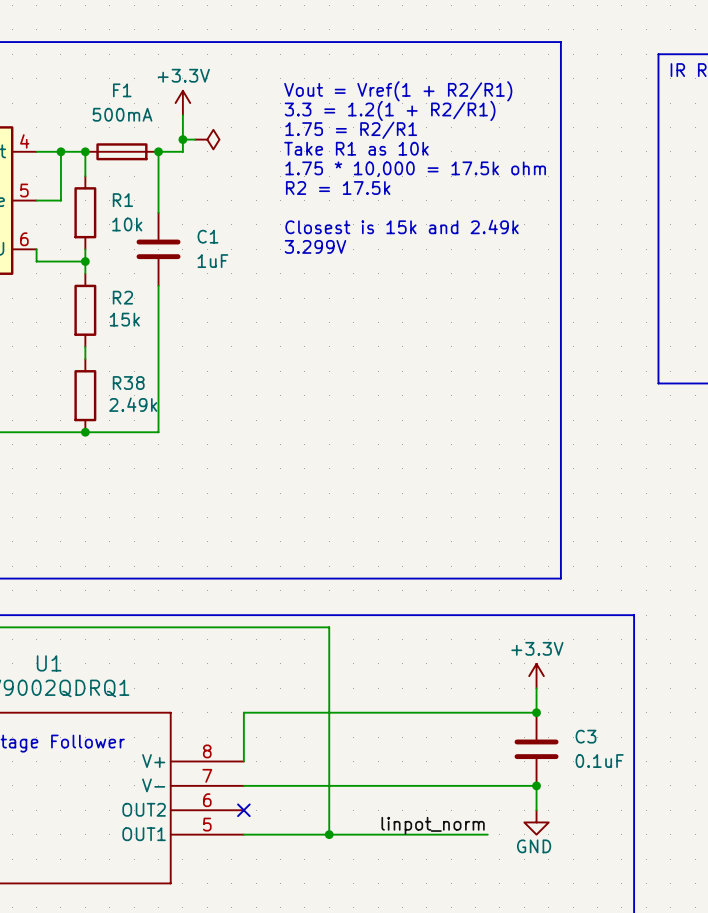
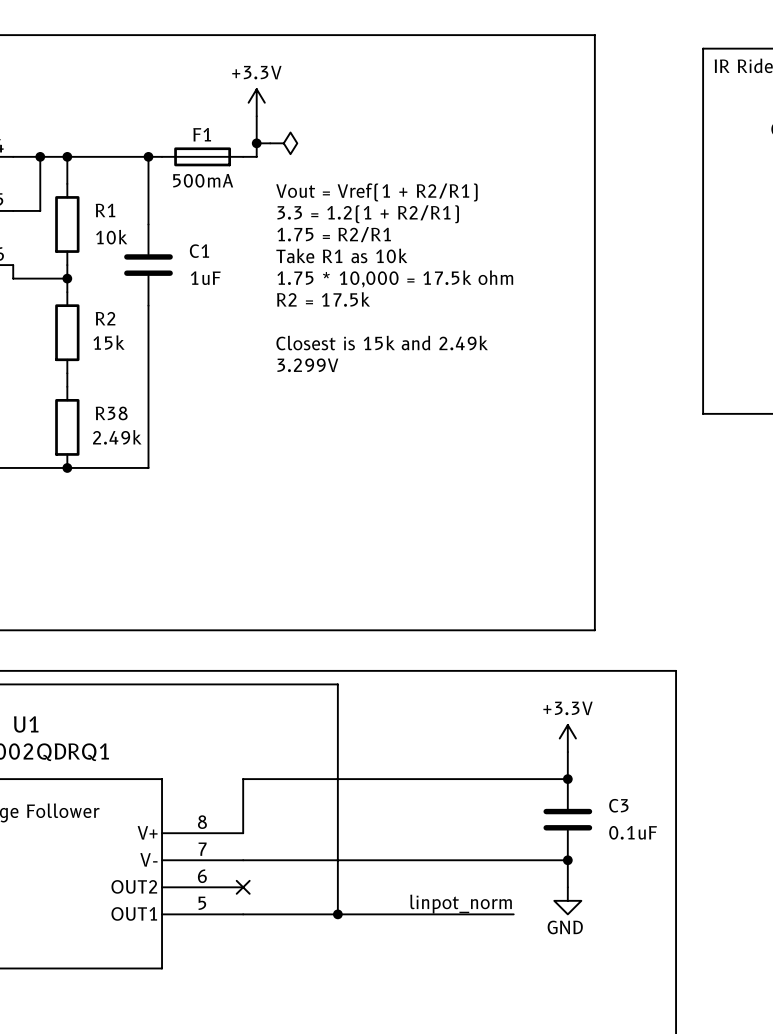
F1 name position: F1 (122, 90) -> F1 (202, 134)
text position: Vout = Vref(1 + R2/R1) (398, 91) -> Vout = Vref(1 + R2/R1) (376, 192)
power symbol position: +3.3V (182, 103) -> +3.3V (256, 102)
text position: 3.3 = 1.2(1 + R2/R1) (390, 110) -> 3.3 = 1.2(1 + R2/R1) (368, 214)
F1 value position: 500mA (122, 114) -> 500mA (203, 180)
wire: (182, 115) (182, 151) (170, 151) -> (256, 116) (256, 156) (243, 156)
text position: 1.75 = R2/R1 (351, 130) -> 1.75 = R2/R1 (334, 234)
wire: (182, 139) (195, 139) -> (256, 143) (270, 143)
junction: (182, 139) -> none
power symbol position: (207, 139) -> (283, 143)
junction: none -> (256, 143)
text position: Take R1 as 10k (356, 148) -> Take R1 as 10k (341, 255)
F1 position: (121, 151) -> (202, 156)
text position: 1.75 * 10,000 = 17.5k ohm (415, 169) -> 1.75 * 10,000 = 17.5k ohm (395, 278)
text position: R2 = 17.5k (338, 188) -> R2 = 17.5k (323, 299)
text position: Closest is 15k and 2.49k (402, 226) -> Closest is 15k and 2.49k (382, 343)
text position: 3.299V (315, 246) -> 3.299V (307, 365)

